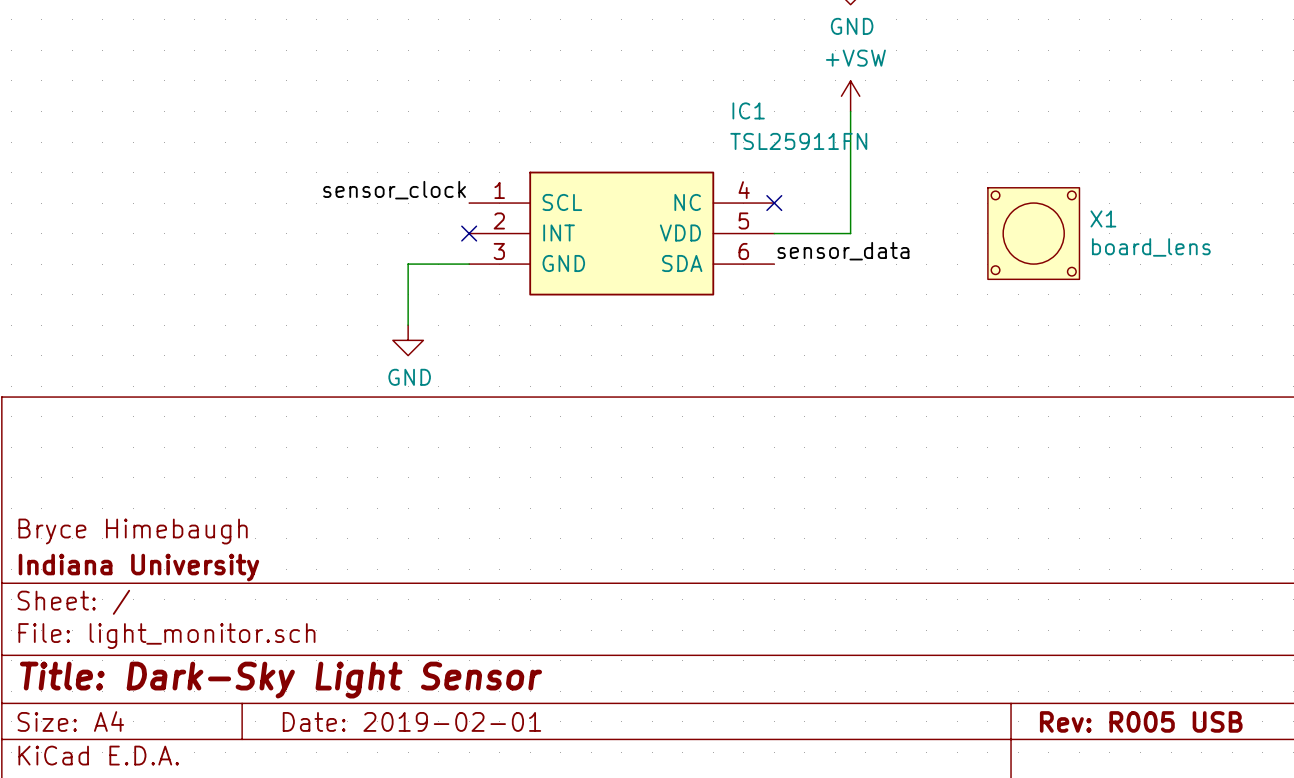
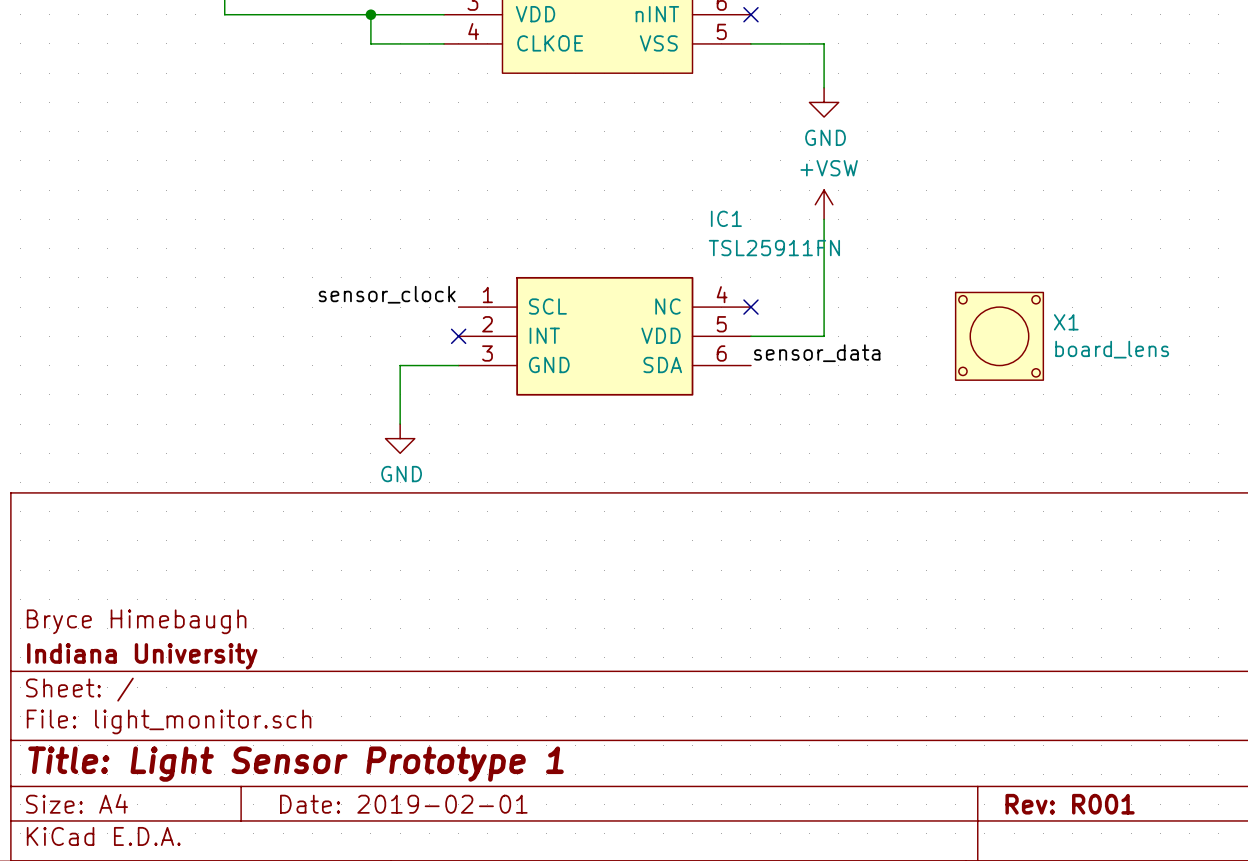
title block: Title: Dark-Sky Light Sensor (280, 680) -> Title: Light Sensor Prototype 1 (295, 764)
title block: Rev: R005 USB (1141, 721) -> Rev: R001 (1070, 804)

